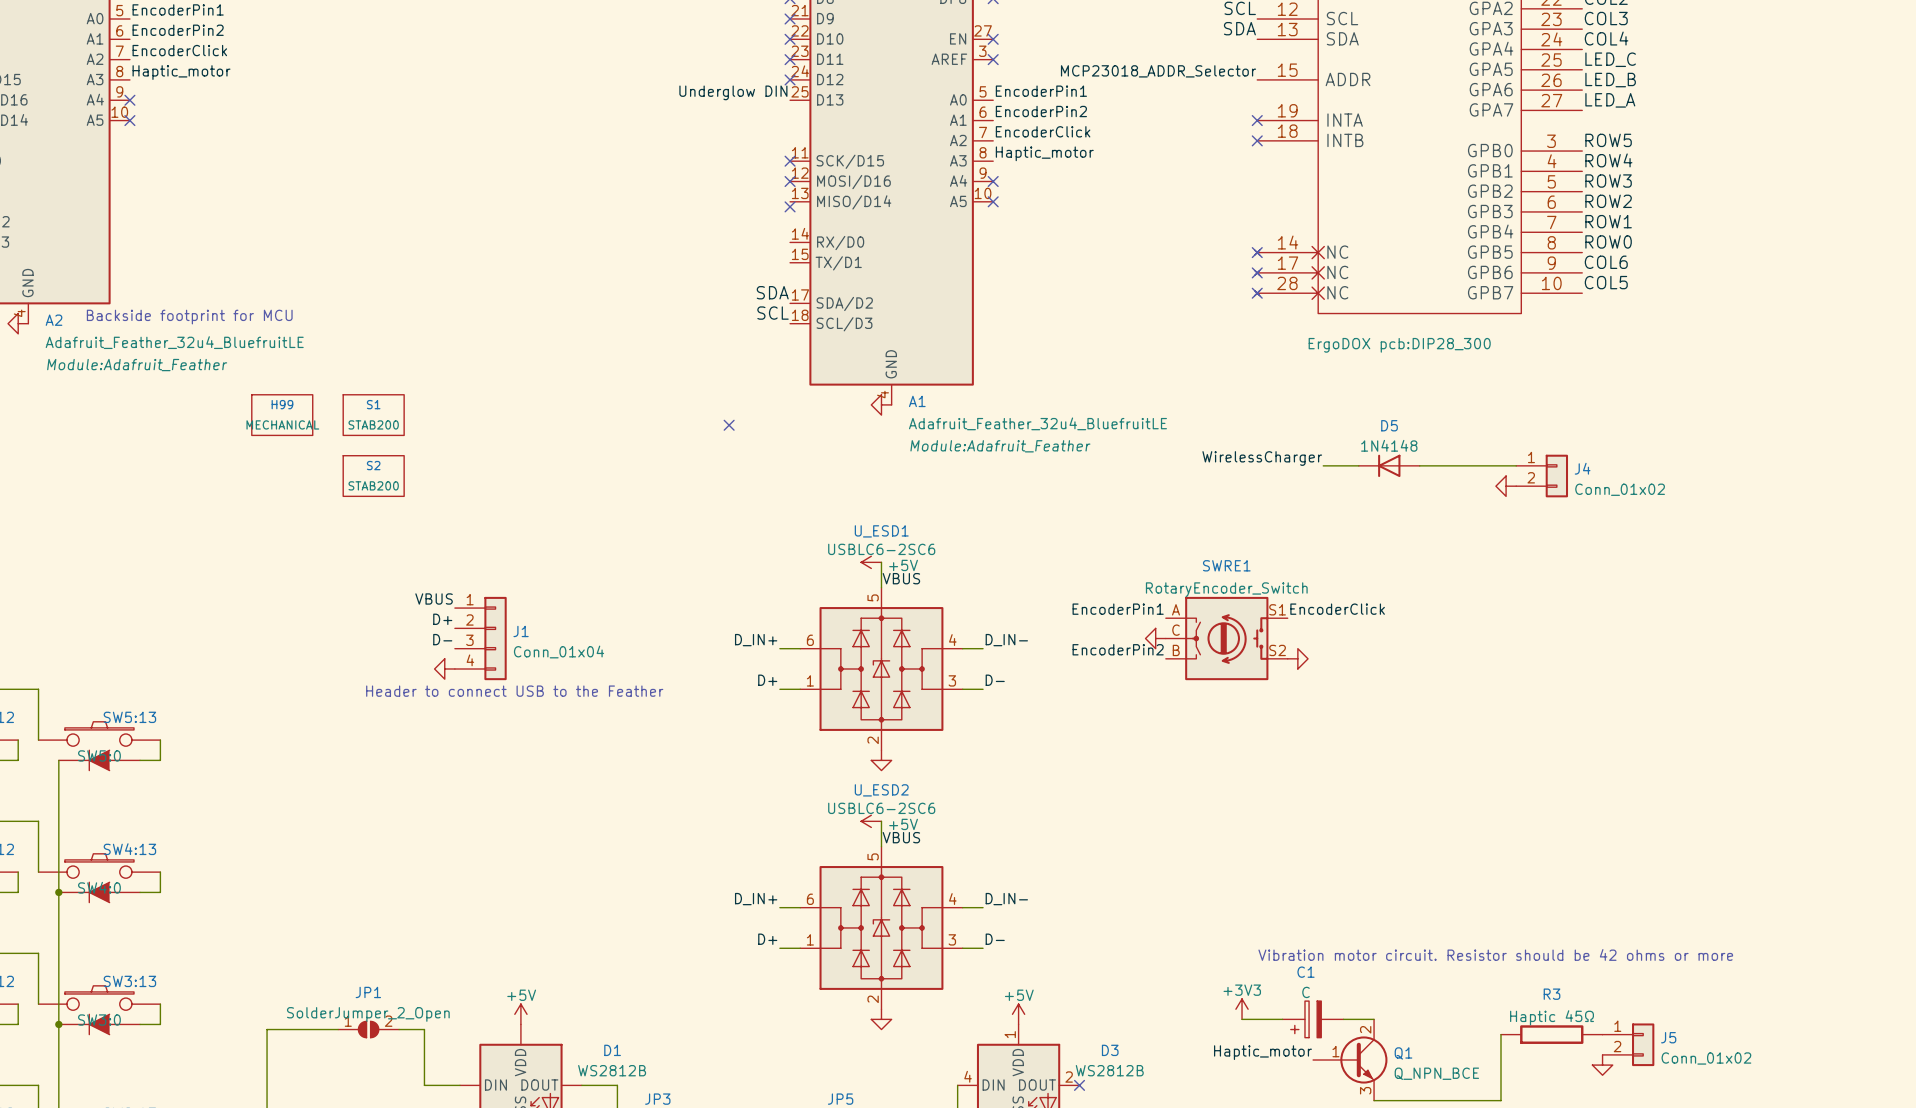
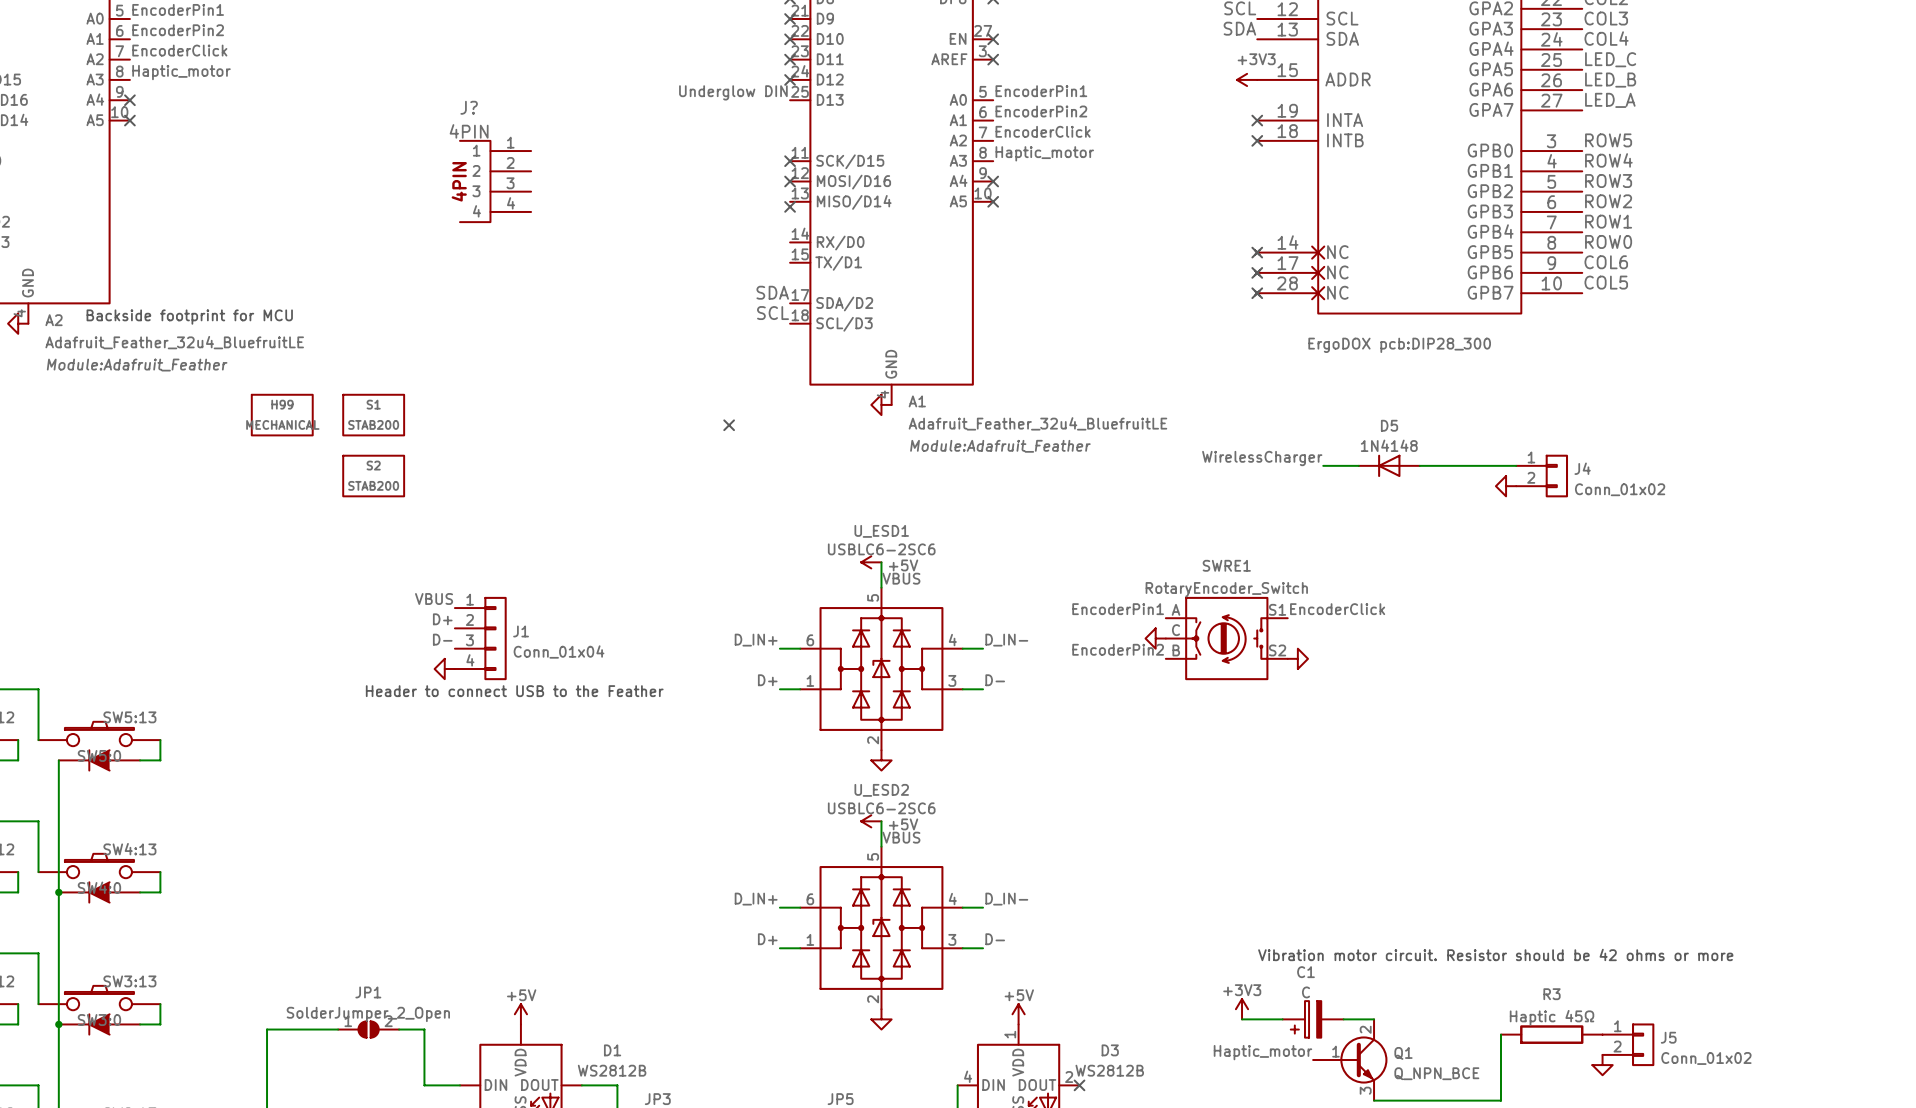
label: MCP23018_ADDR_Selector (1158, 71) -> none
power symbol: none -> +3V3 (1247, 79)
J?: none -> 4PIN (495, 181)

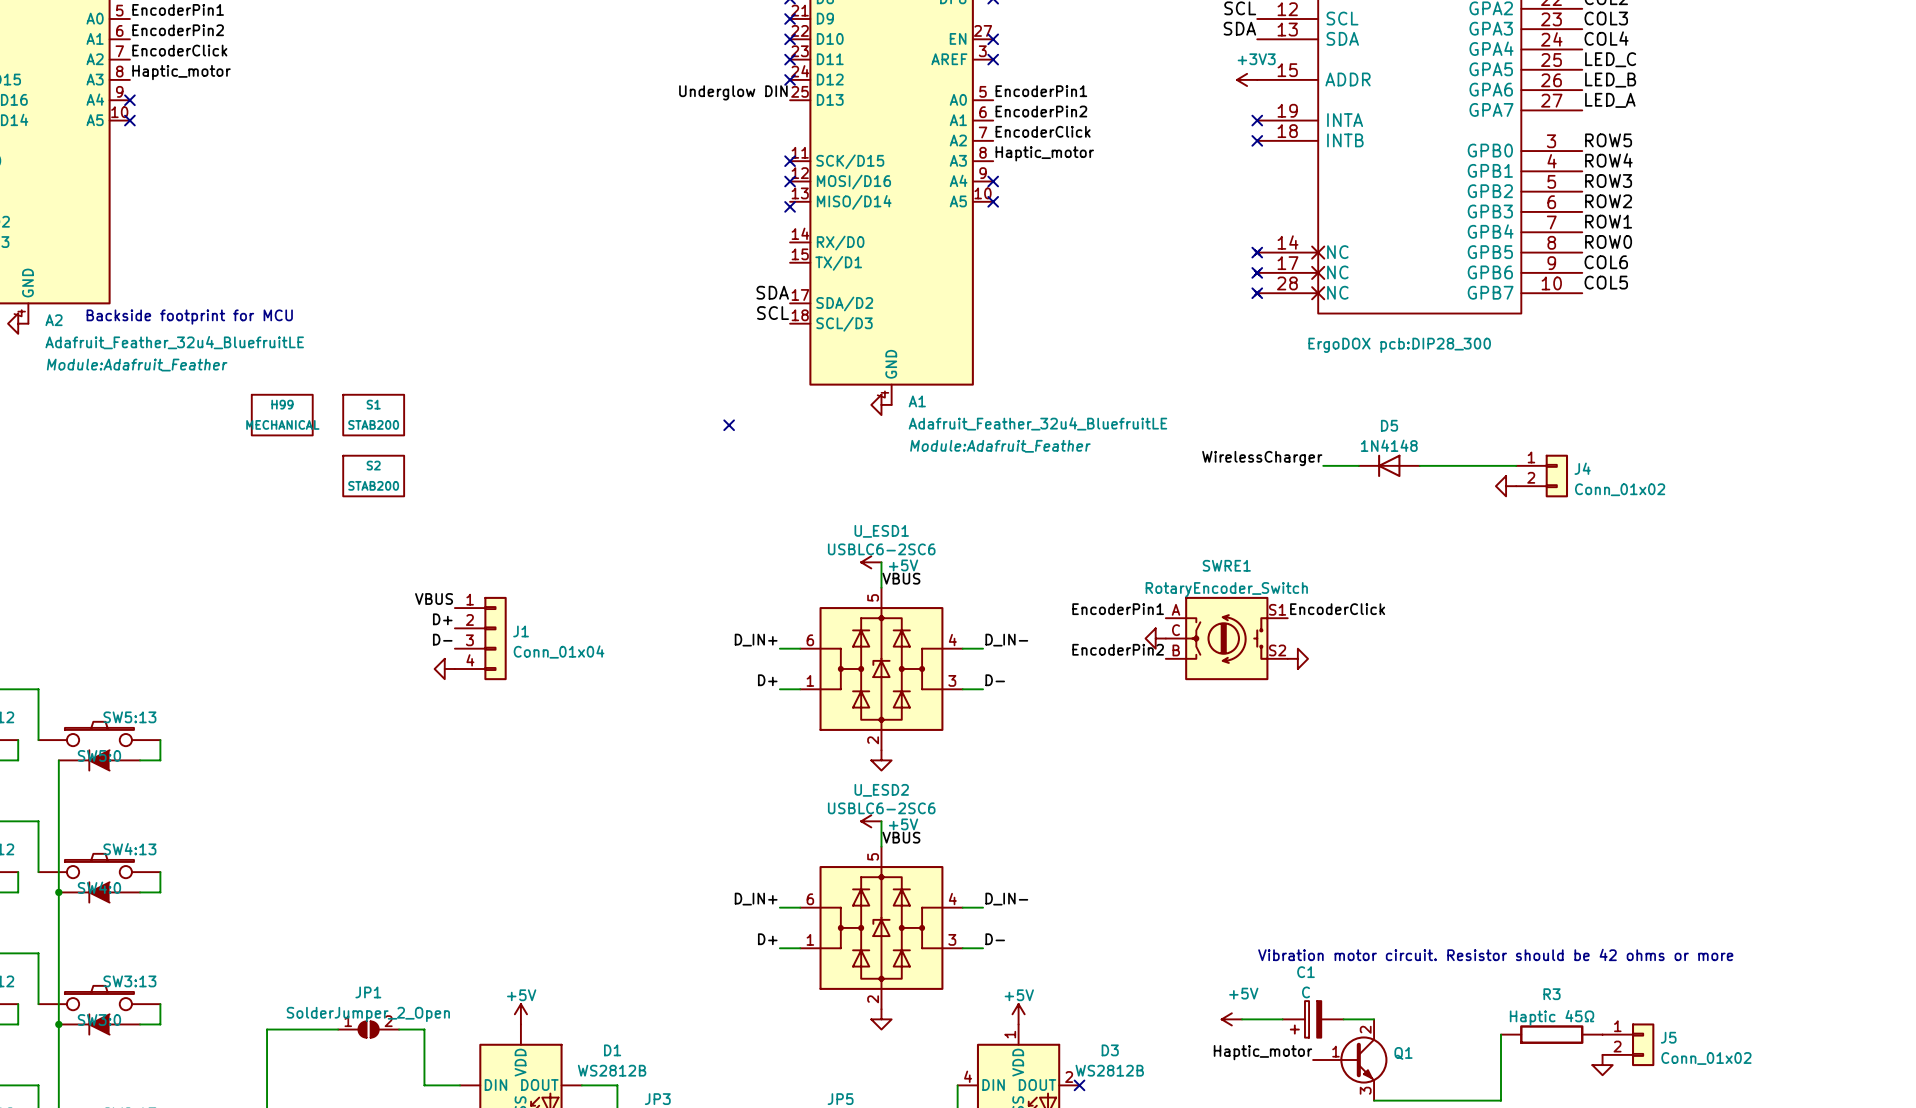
J?: 4PIN (495, 181) -> none
text: Header to connect USB to the Feather (514, 691) -> none
power symbol: +3V3 (1242, 1009) -> none
power symbol: none -> +5V (1231, 1019)
Q1 value: Q_NPN_BCE (1436, 1073) -> none

